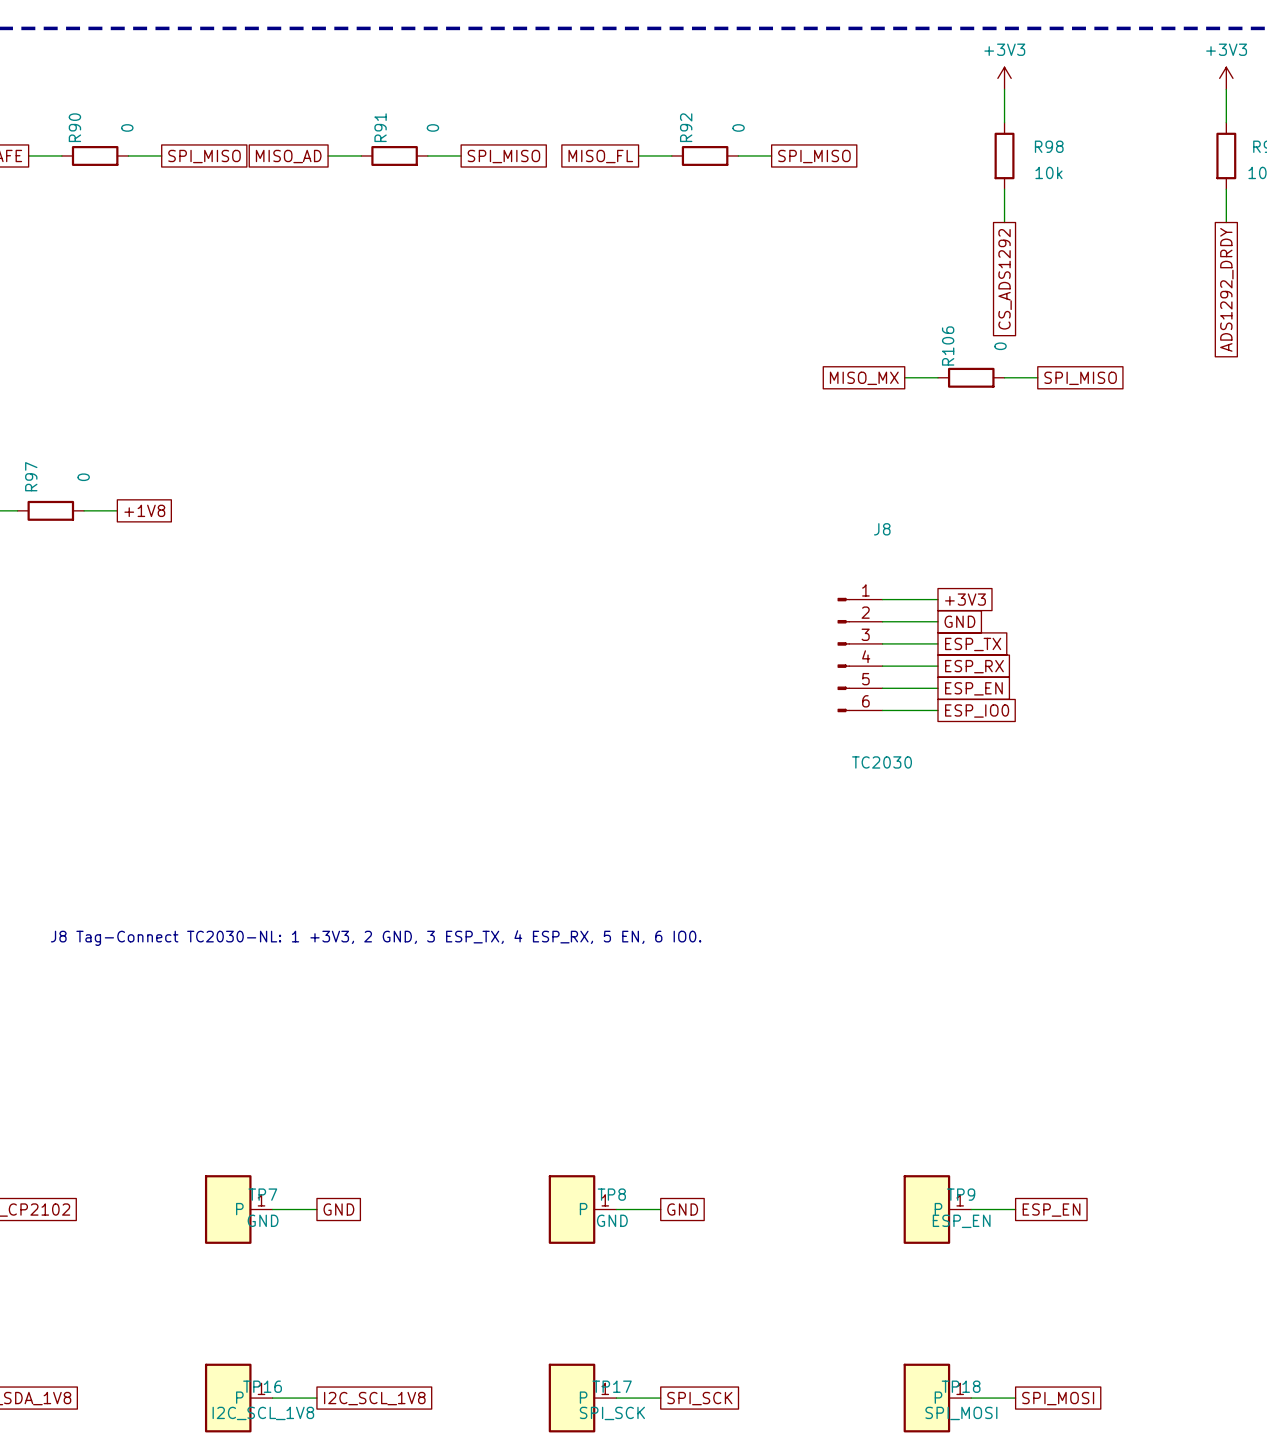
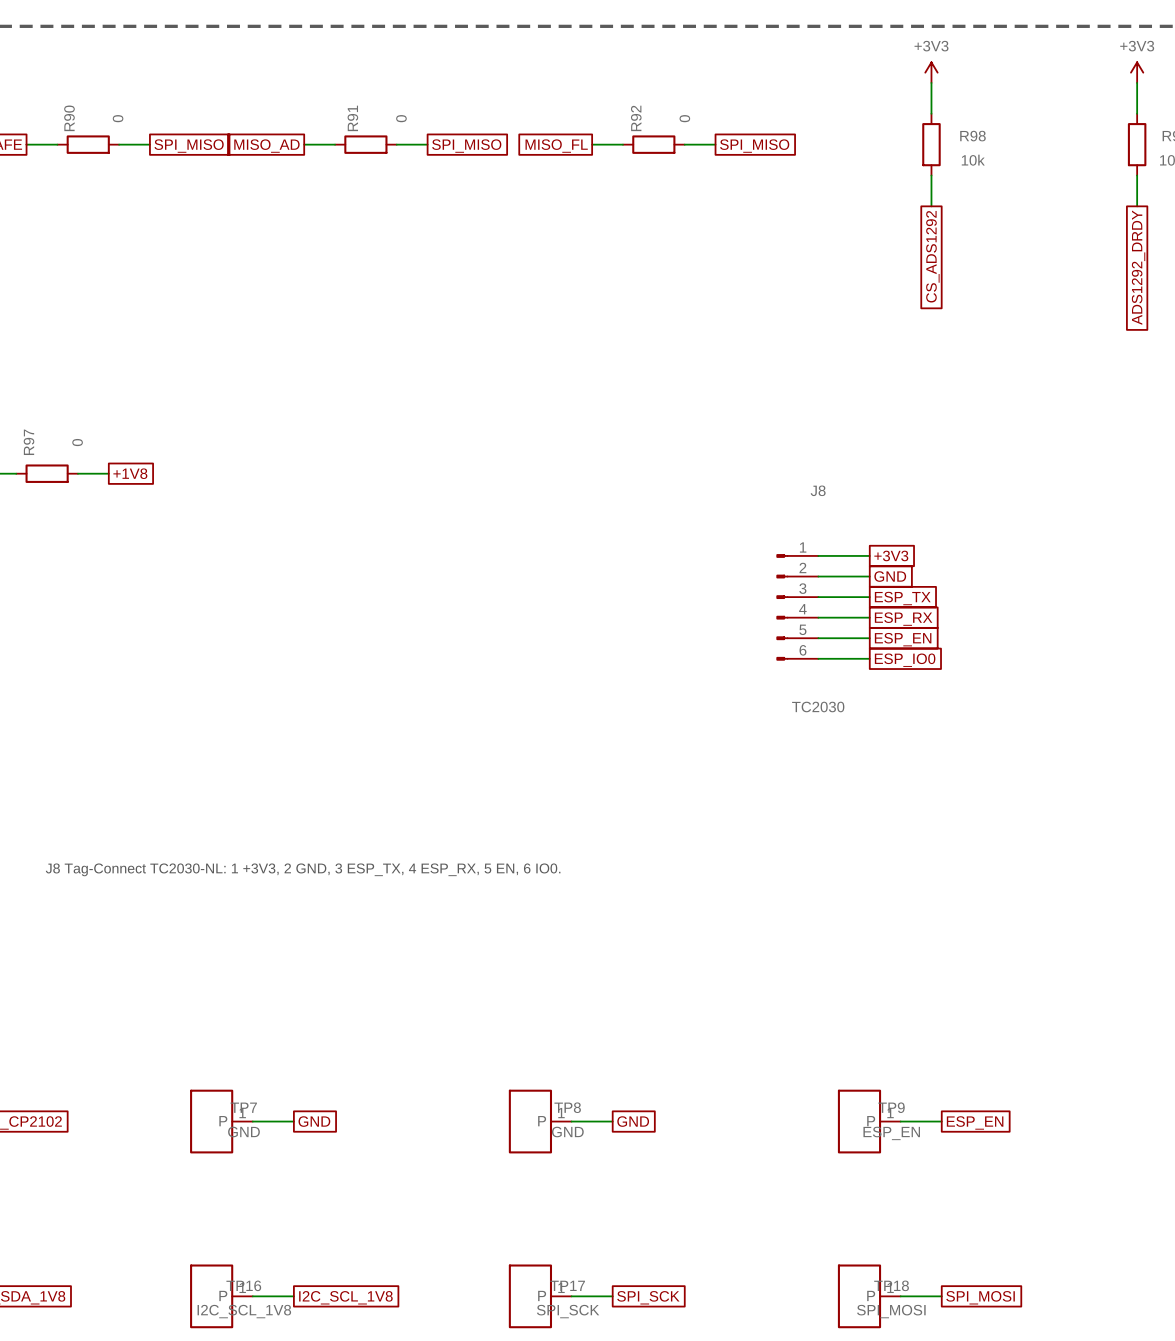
wire: (904, 377) (937, 377) -> none
R106: 0 (971, 377) -> none
wire: (1004, 377) (1037, 377) -> none
global label: MISO_MX (864, 378) -> none
global label: SPI_MISO (1080, 378) -> none

